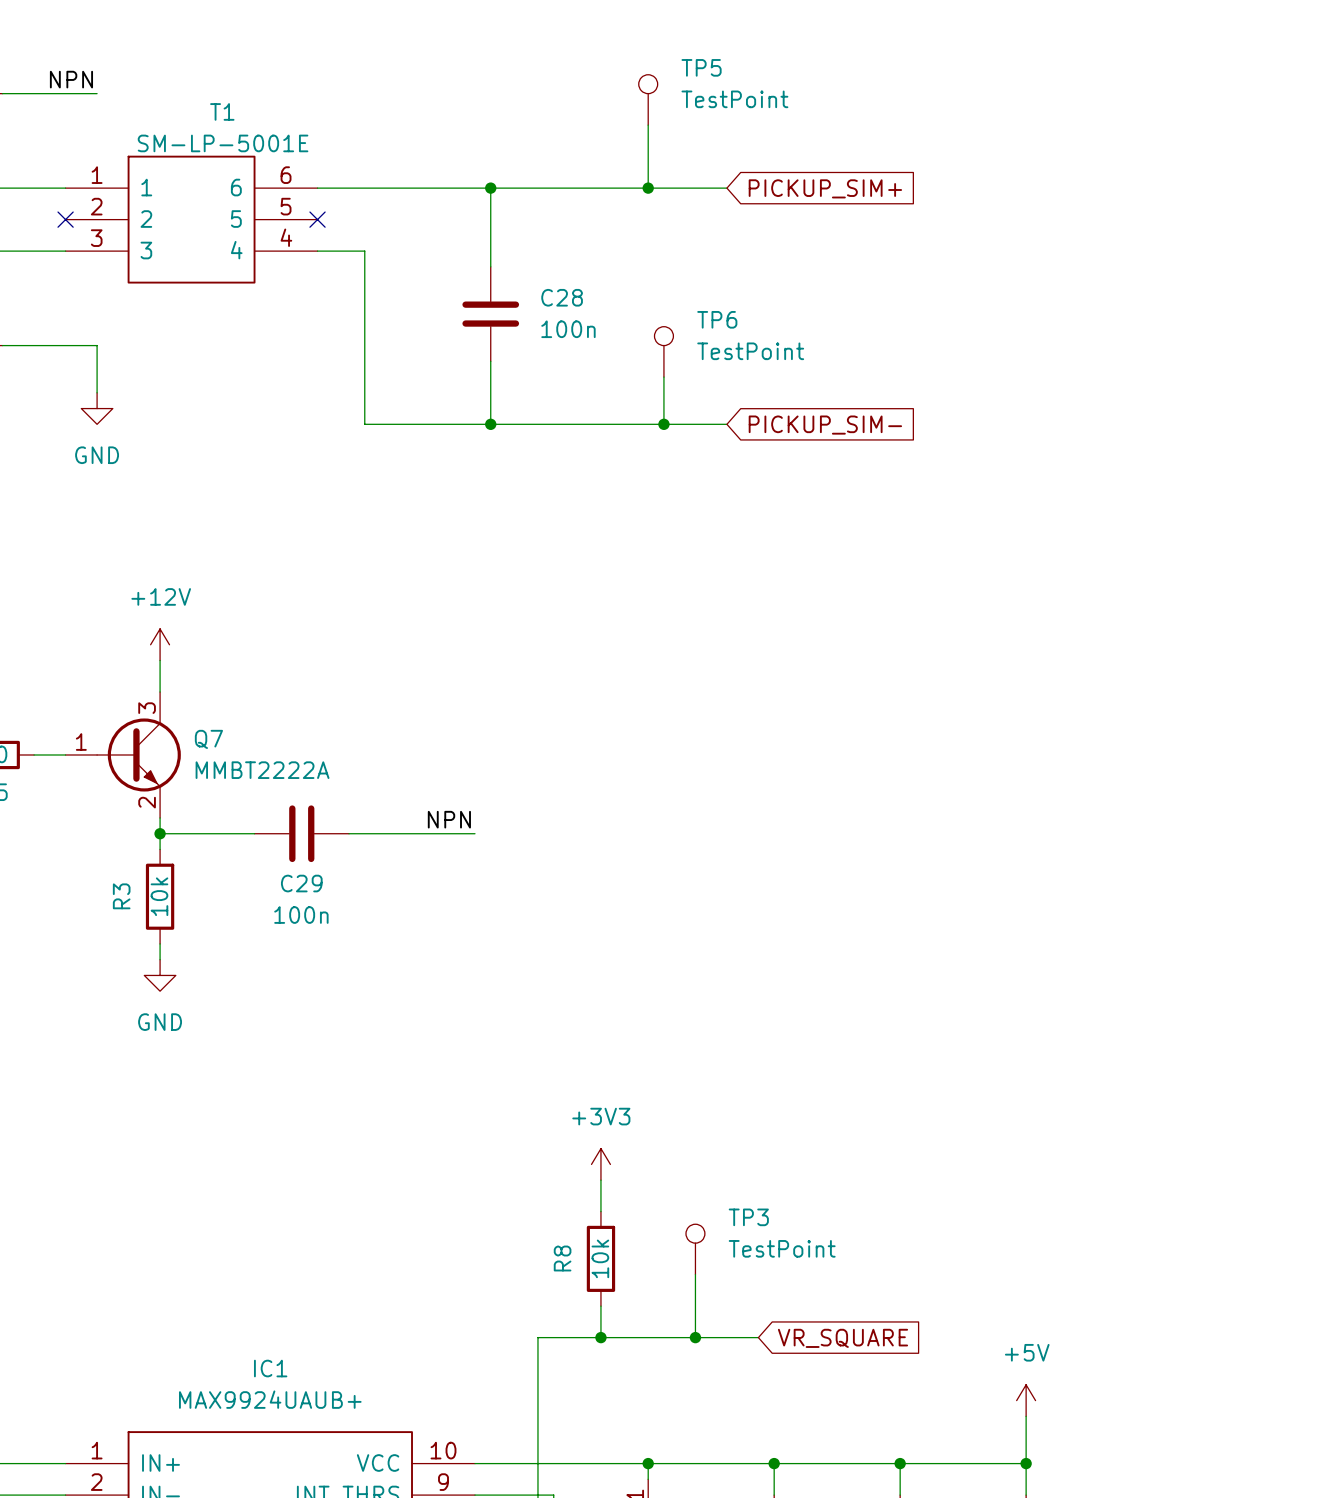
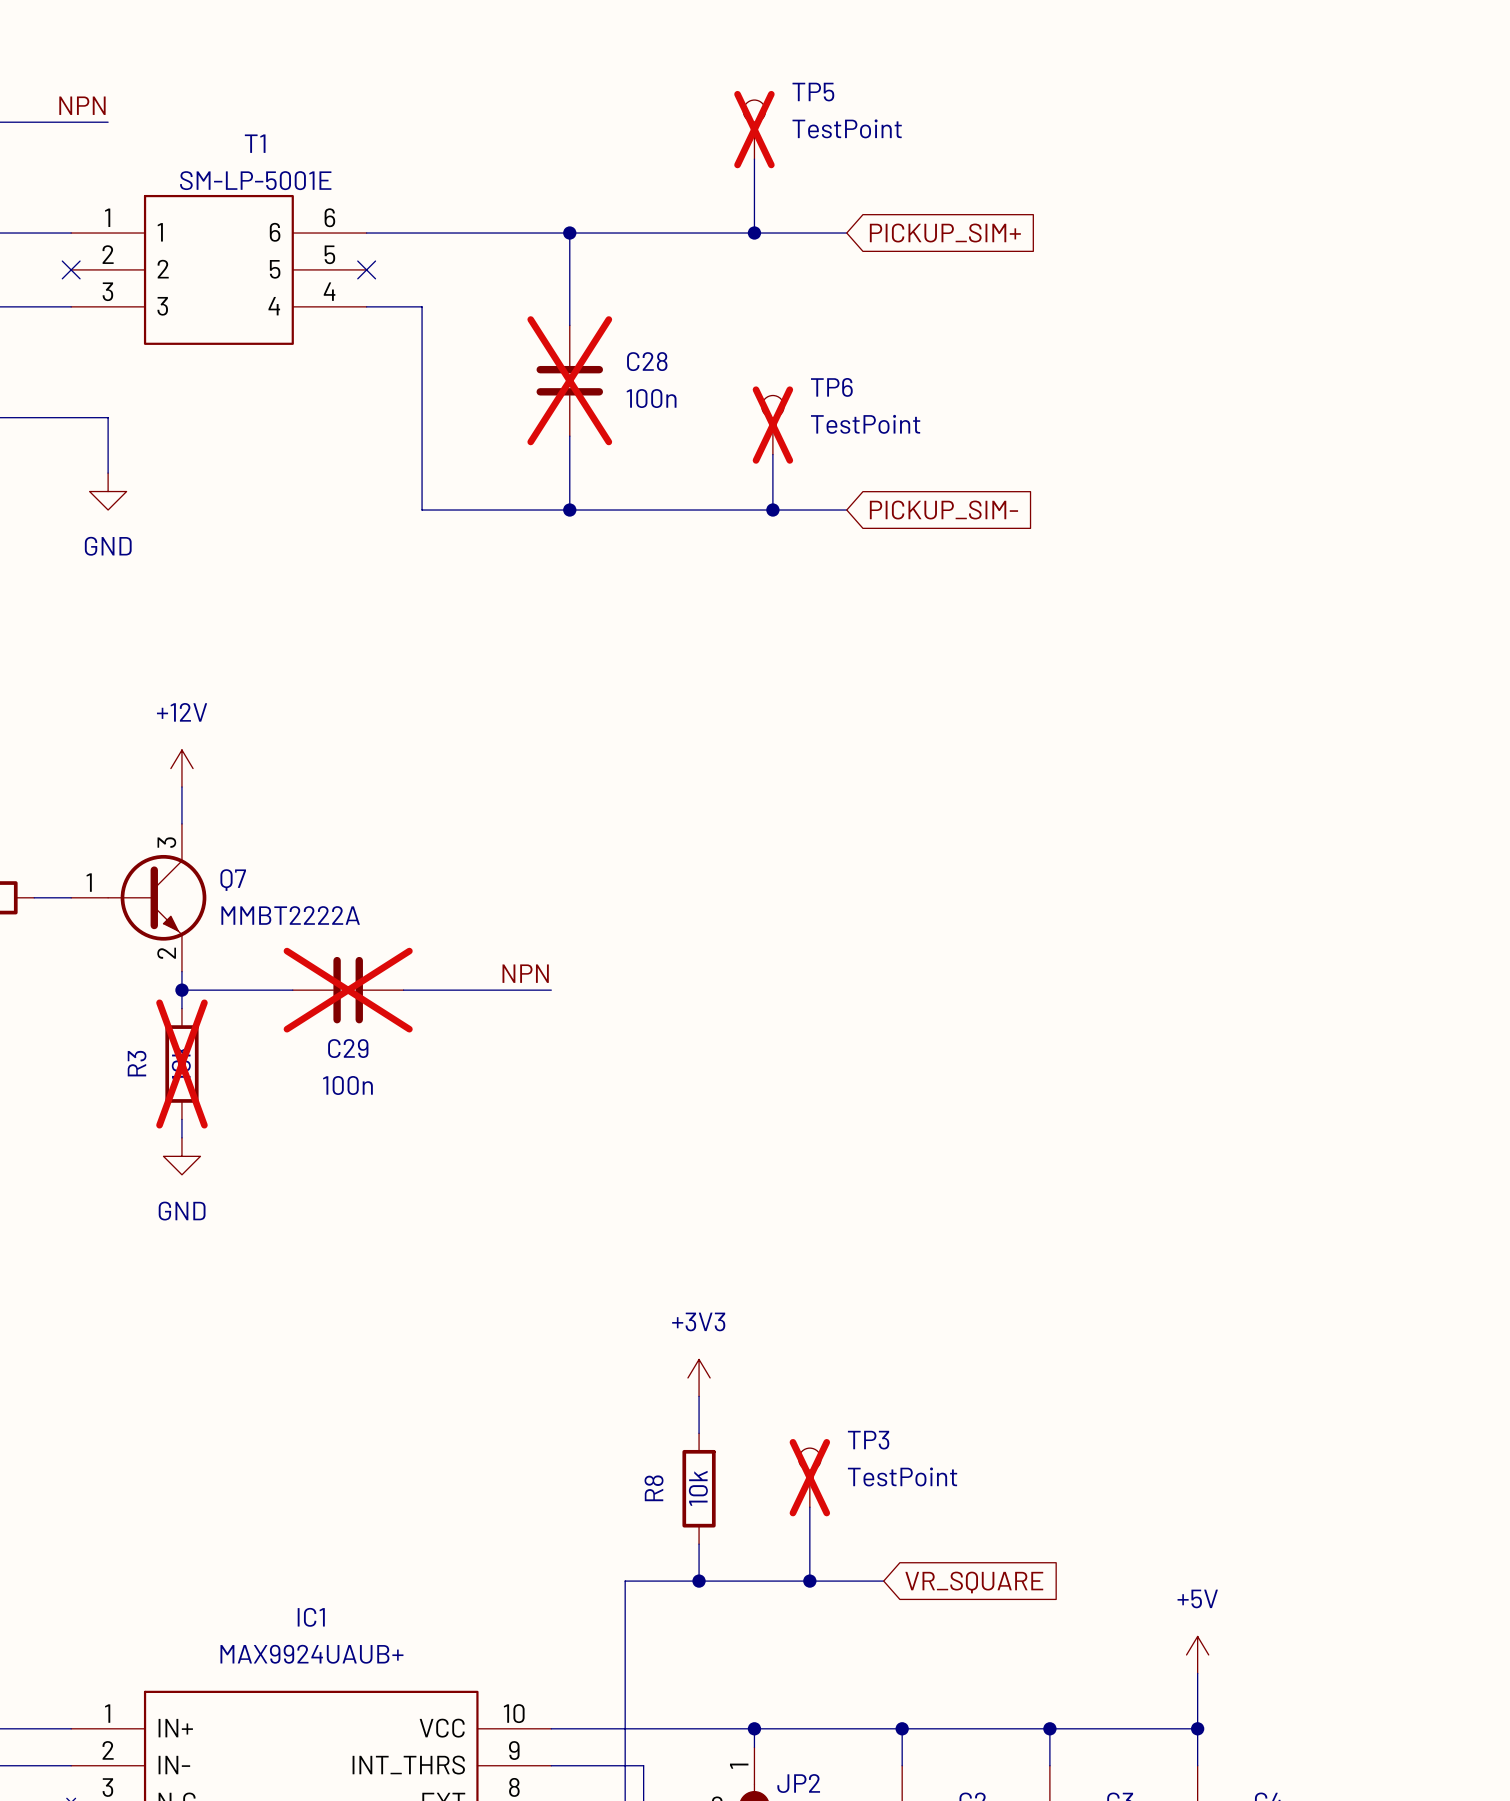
TP5 do-not-place cross: none -> (754, 129)
C28 do-not-place cross: none -> (569, 380)
TP6 do-not-place cross: none -> (772, 425)
C29 do-not-place cross: none -> (348, 990)
R3 do-not-place cross: none -> (181, 1064)
TP3 do-not-place cross: none -> (809, 1477)

